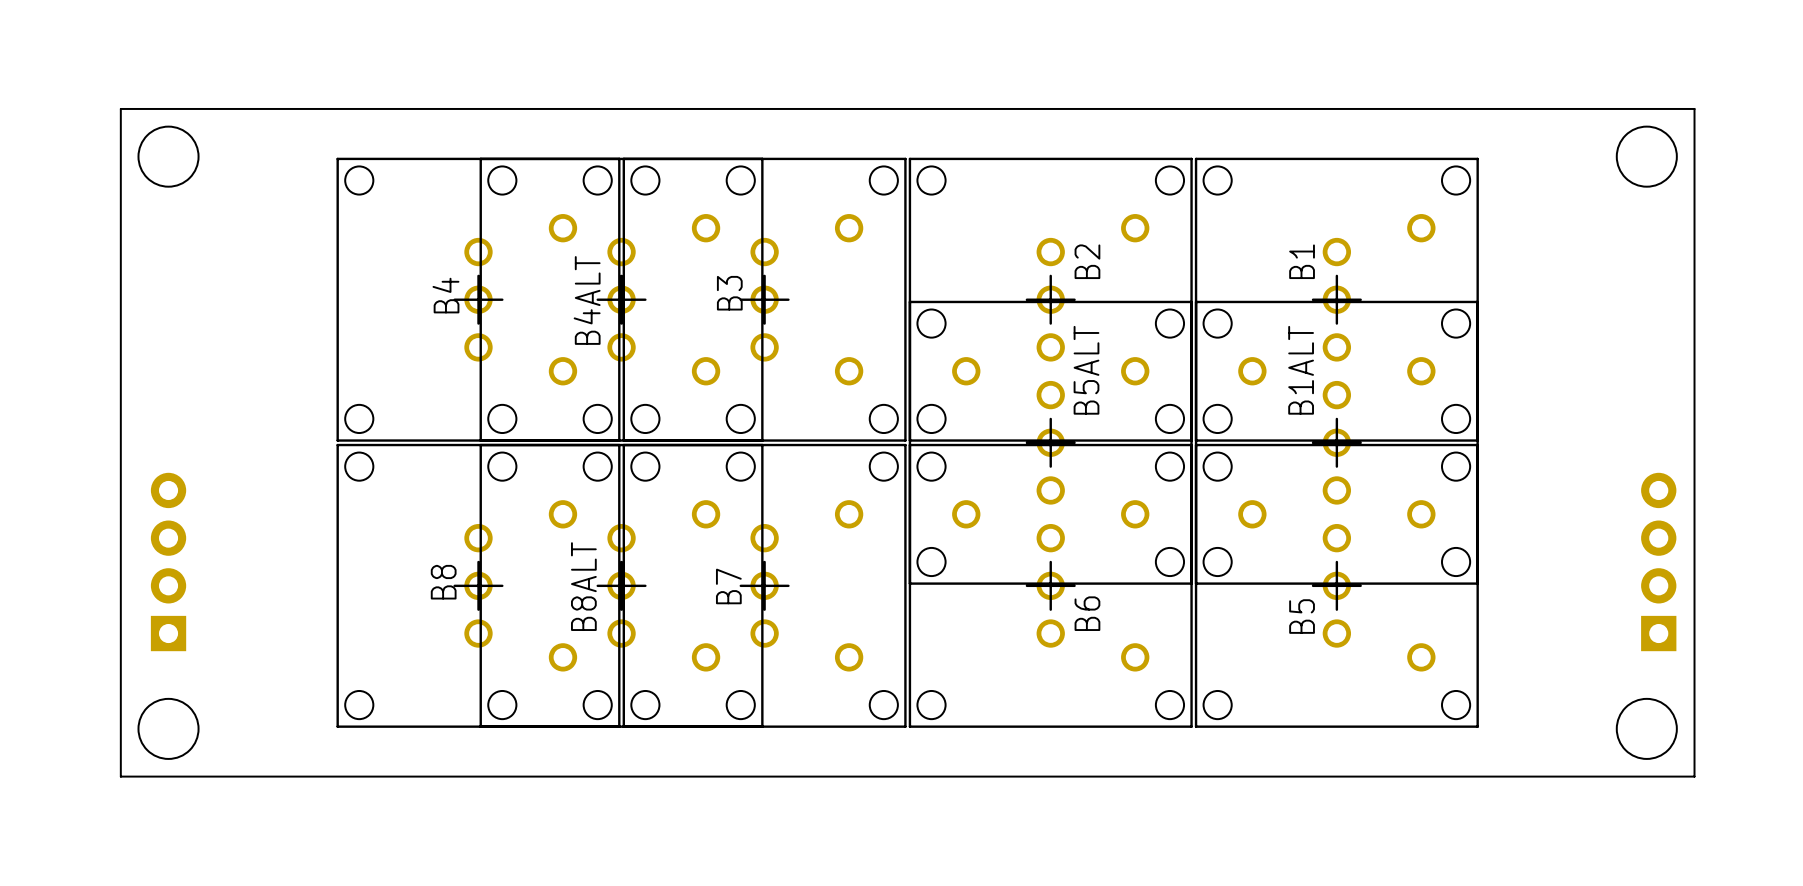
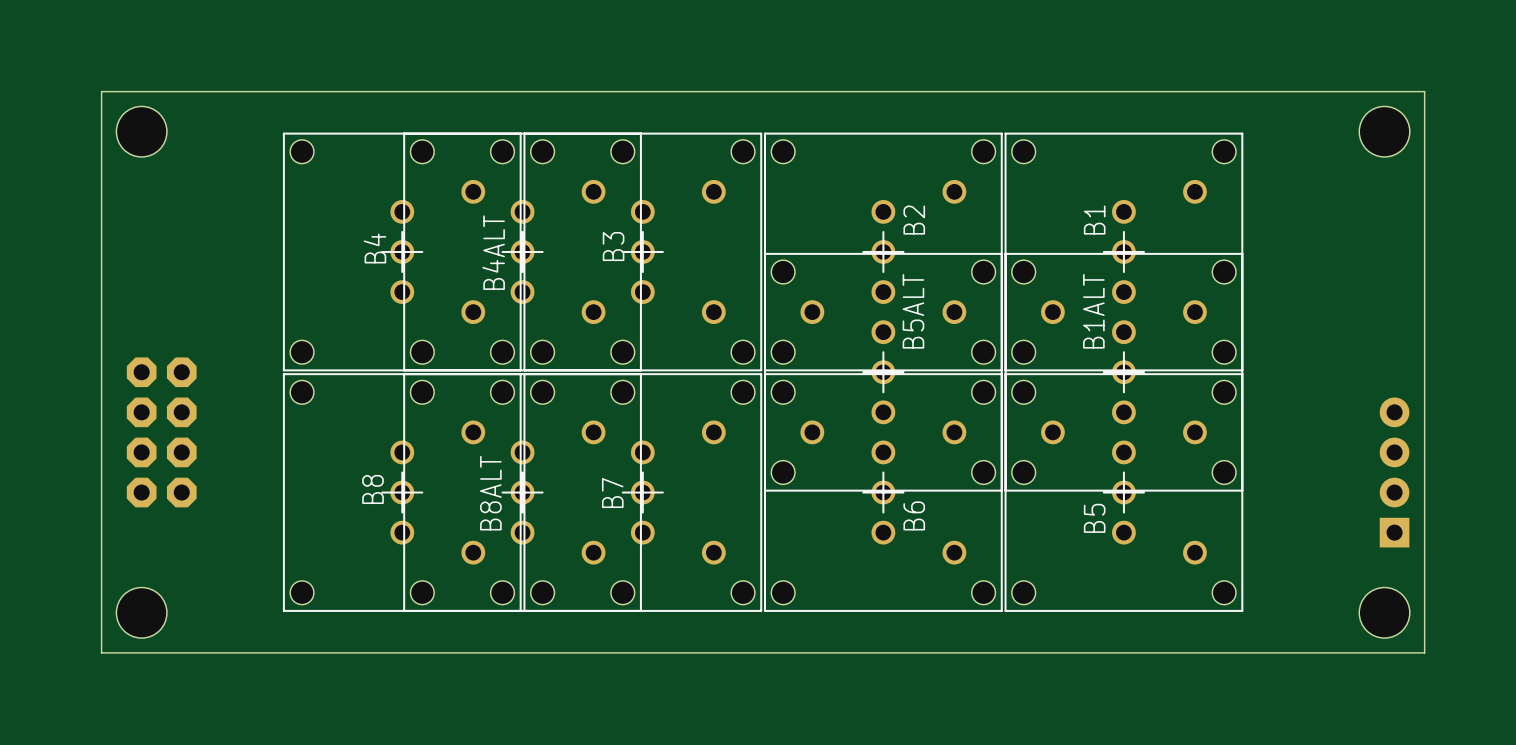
part: none -> (161, 432)
part: (168, 562) -> none

